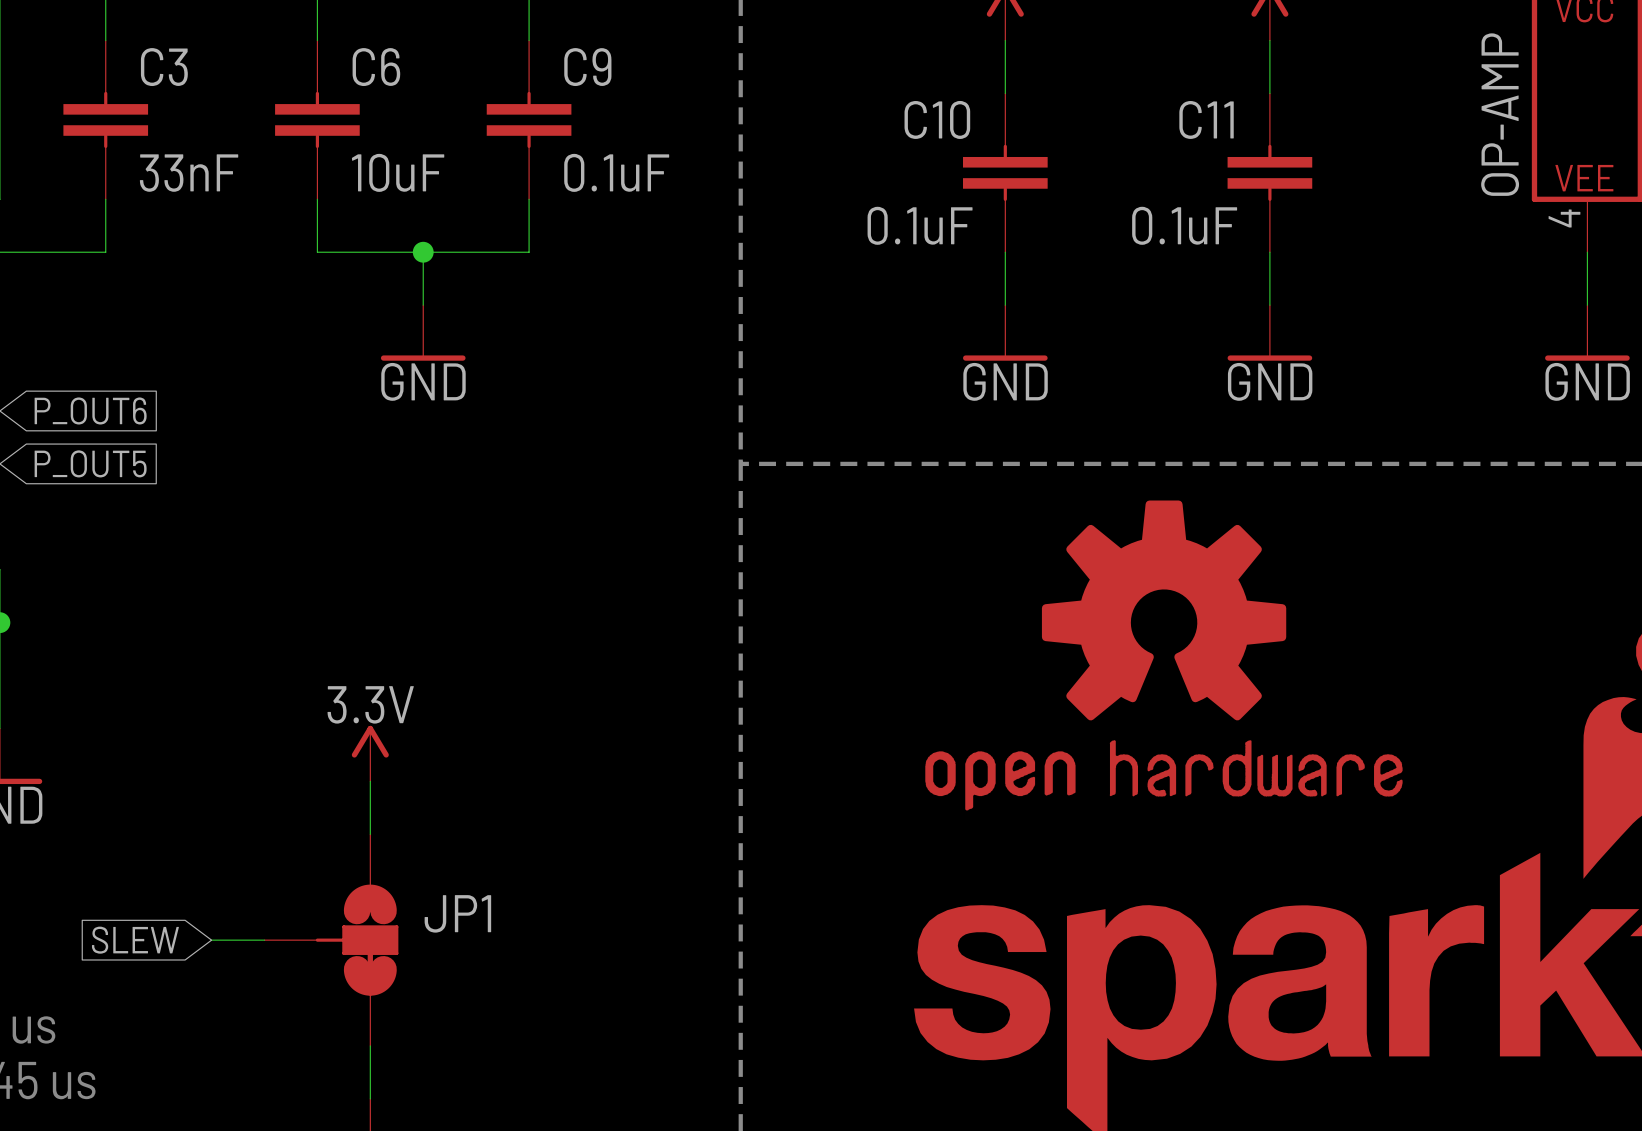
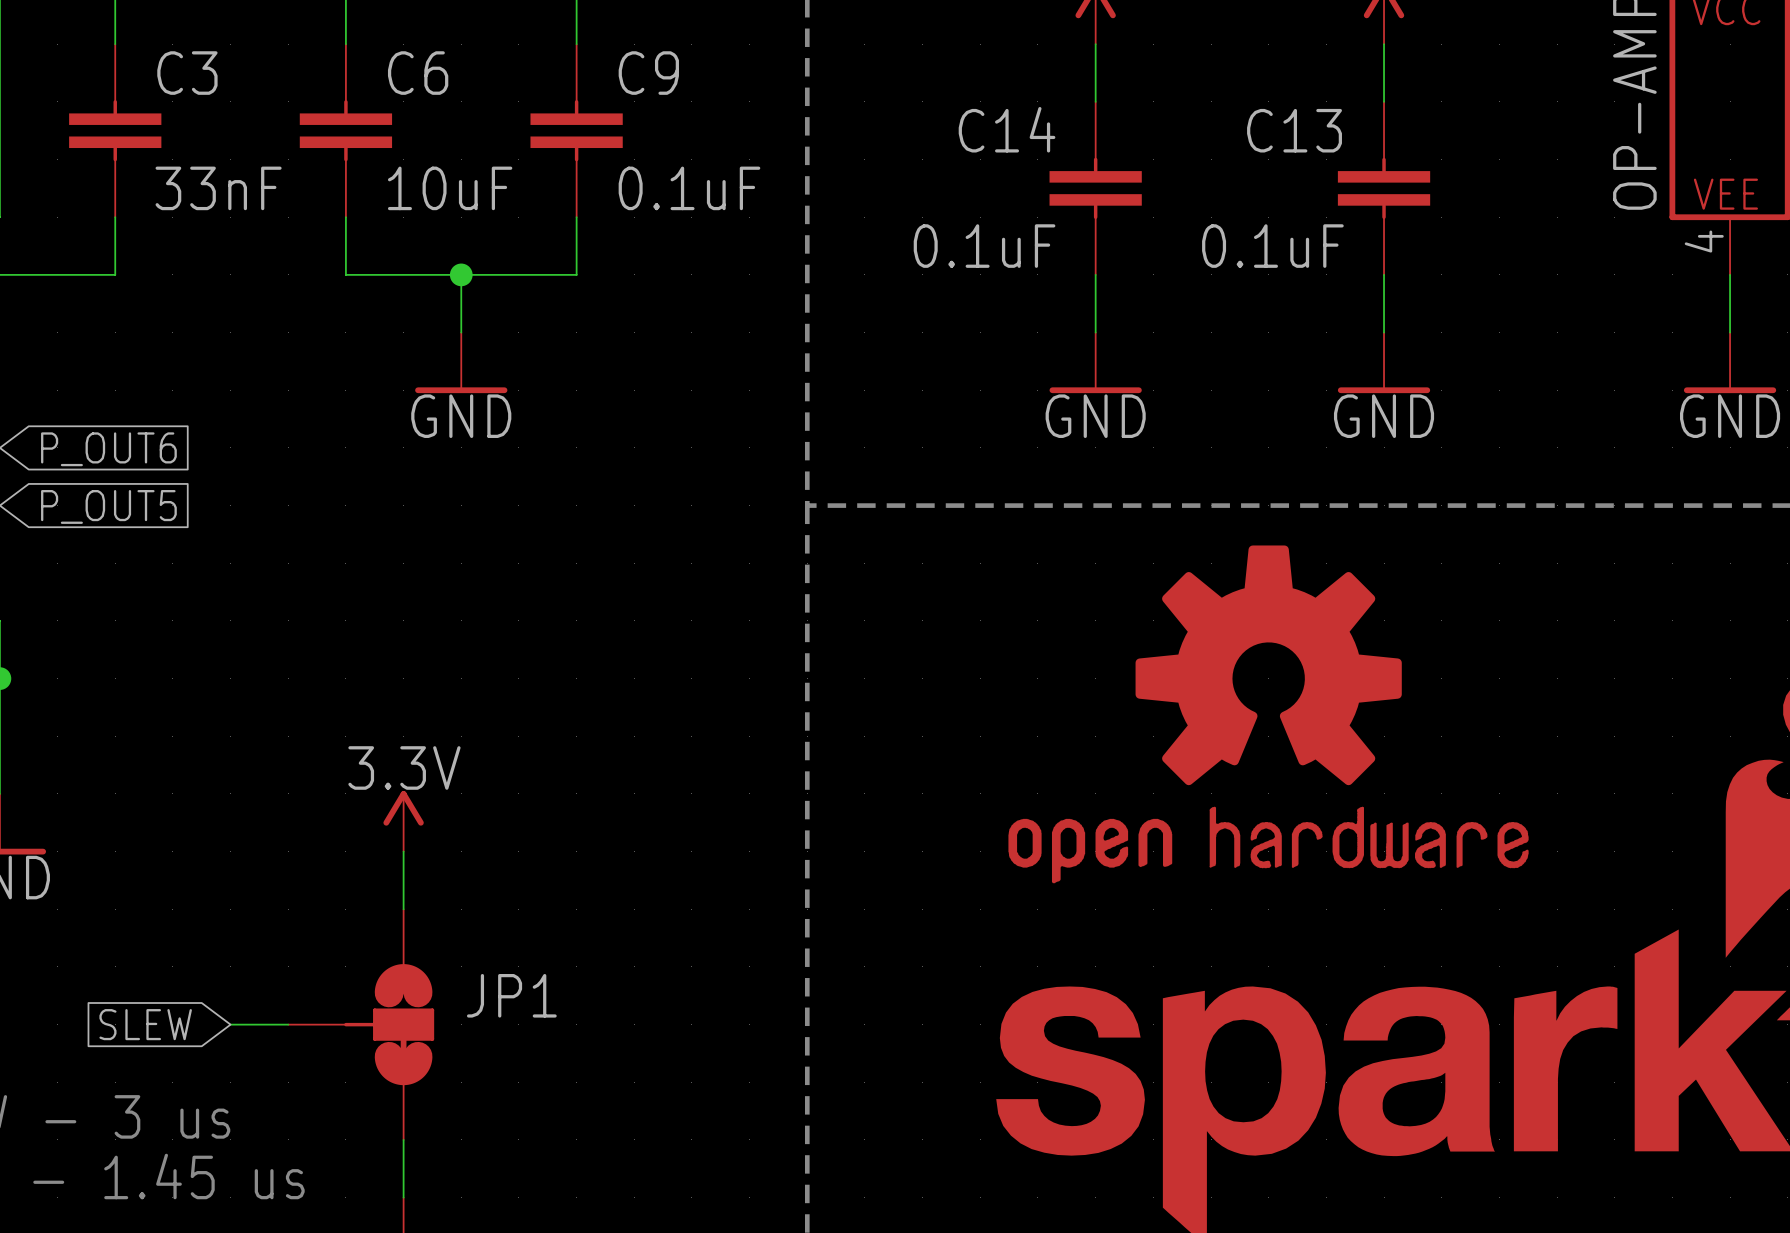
C10 name: C10 (937, 119) -> C14 (1007, 129)
C11 name: C11 (1206, 119) -> C13 (1294, 130)

